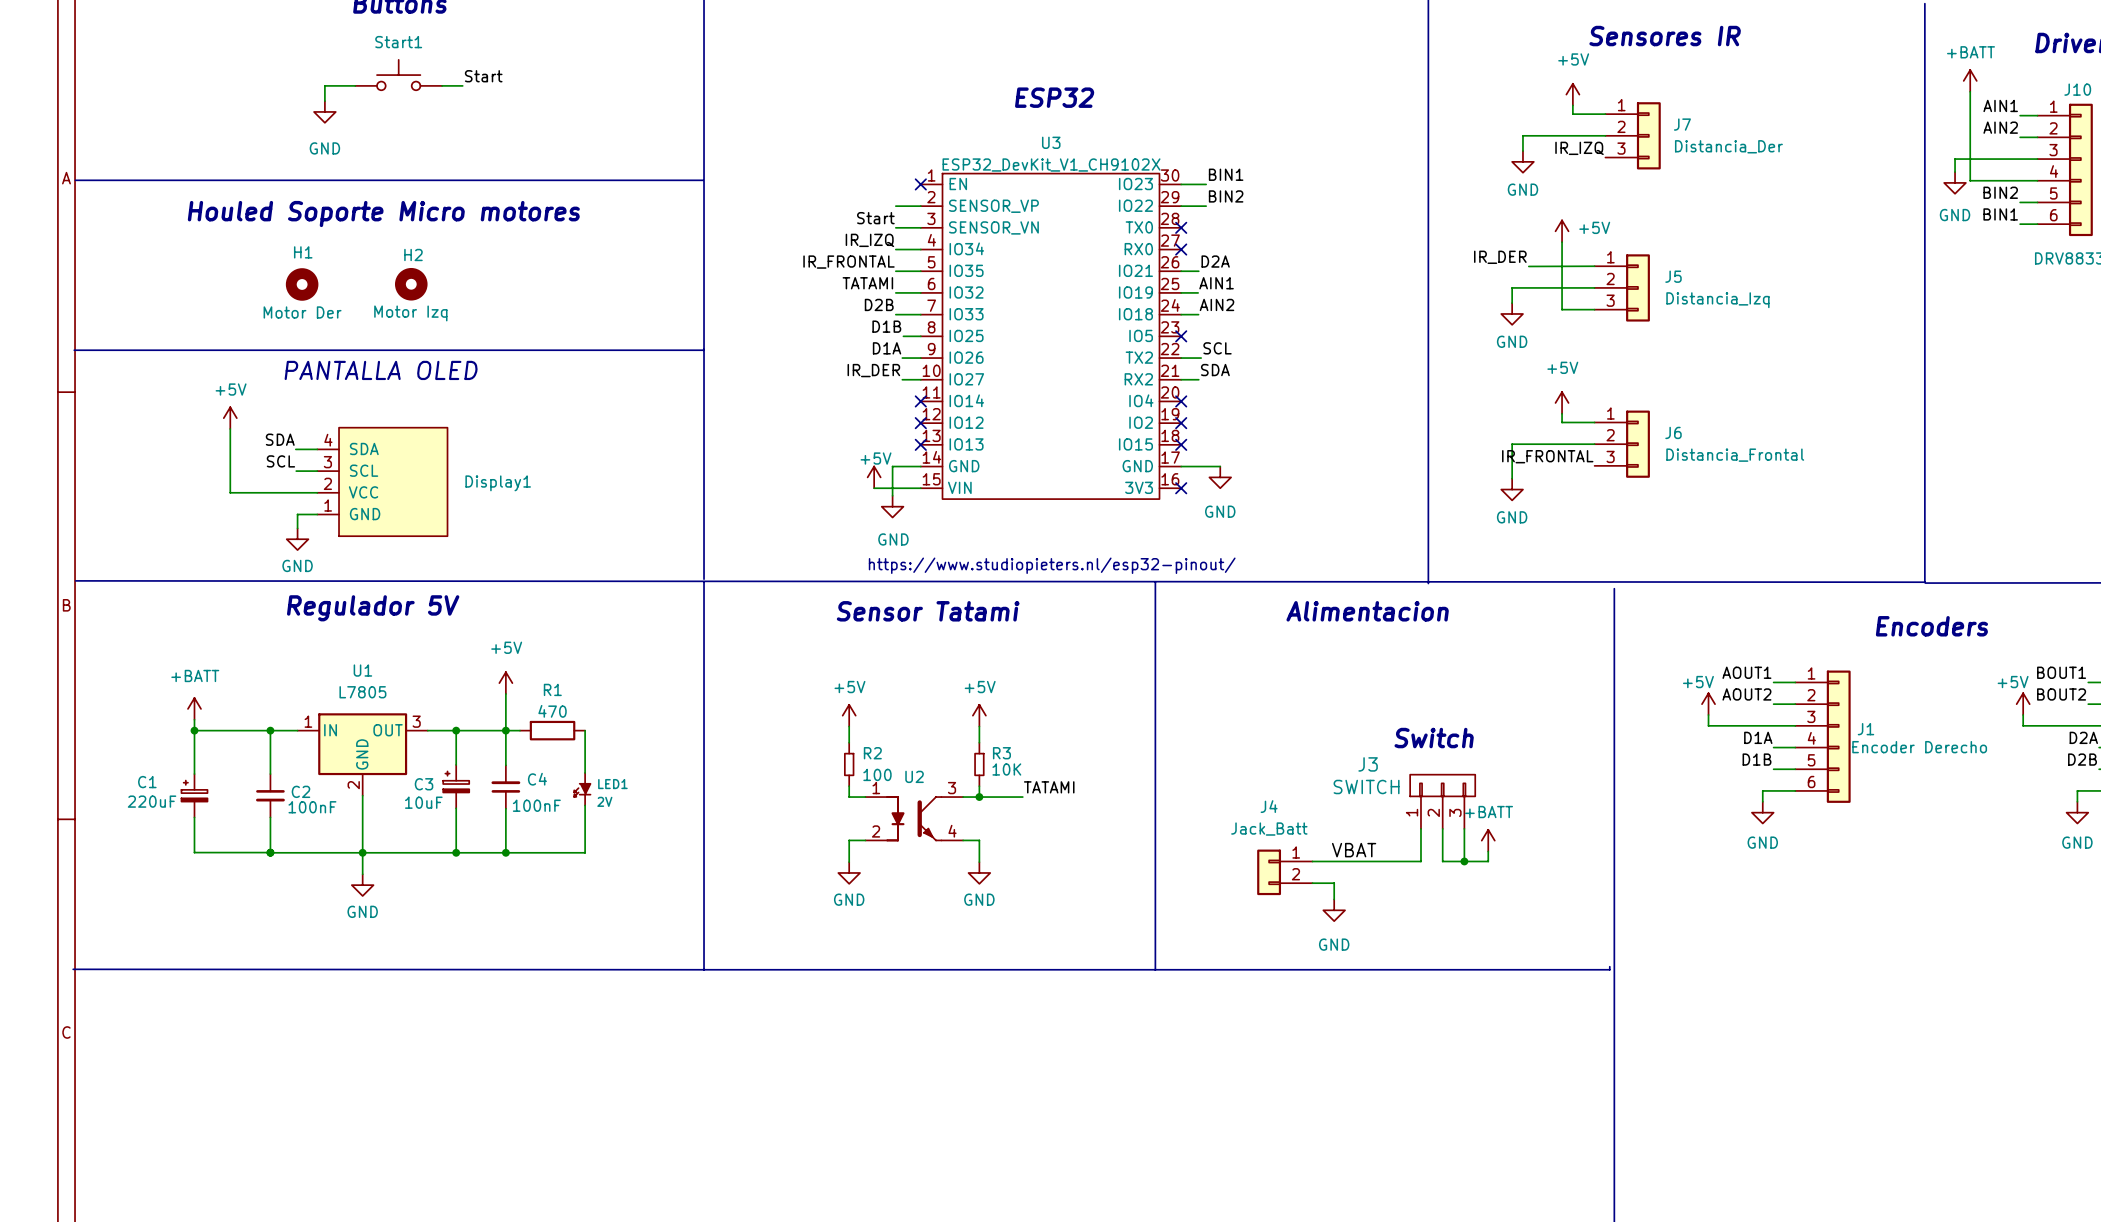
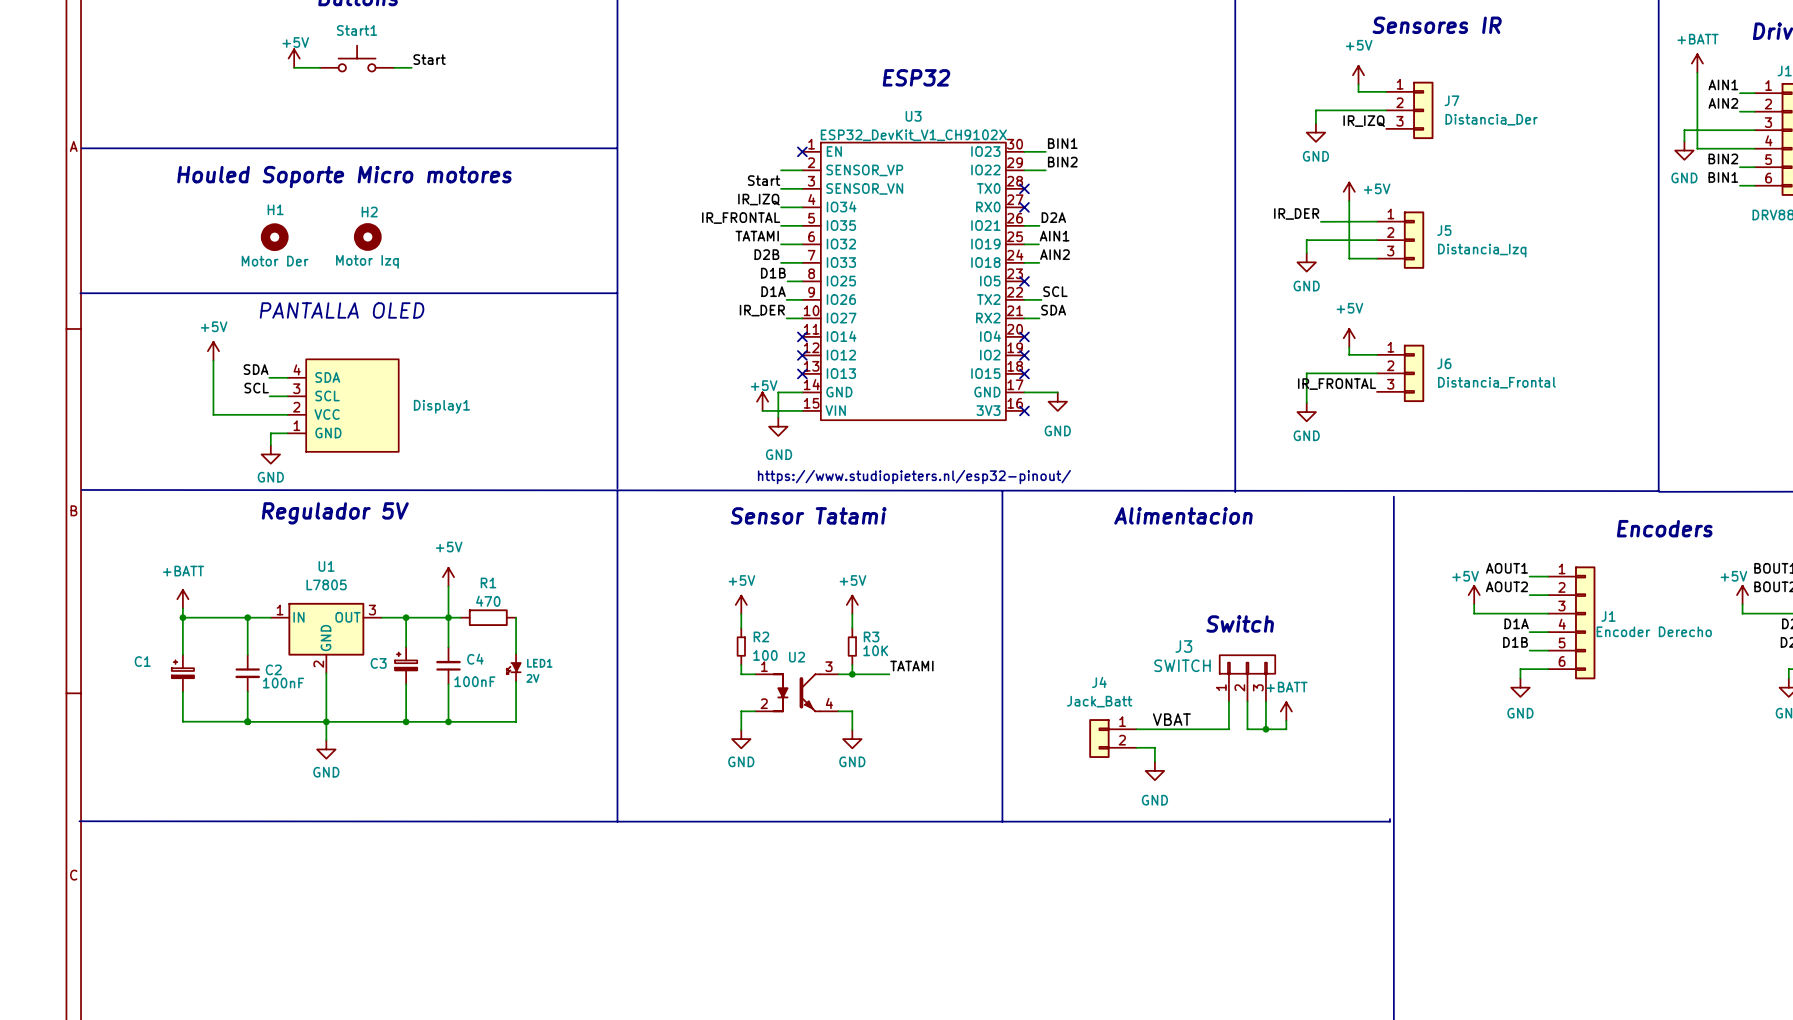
power symbol: none -> +5V (294, 58)
wire: (324, 85) (324, 101) -> none
power symbol: GND (324, 111) -> none
C1 value: 220uF (152, 801) -> none
C3 value: 10uF (423, 802) -> none

